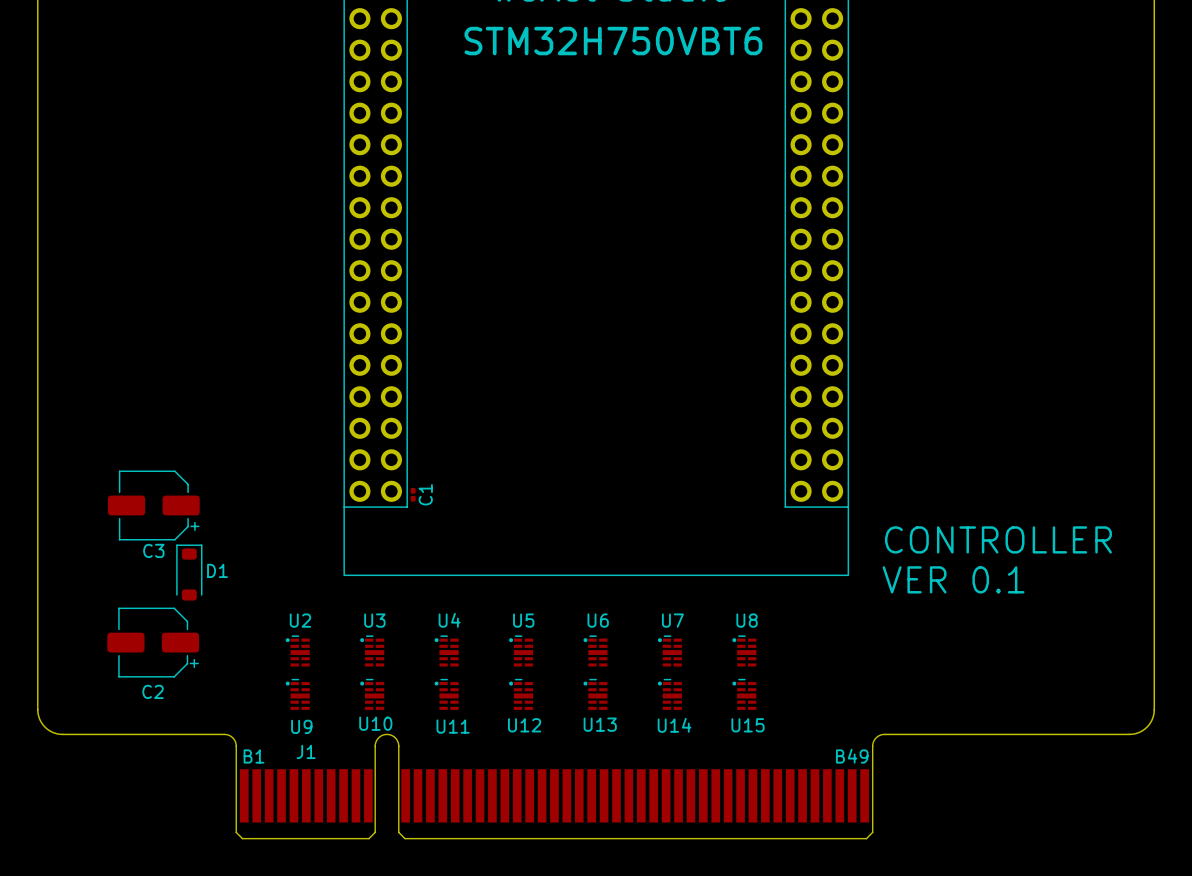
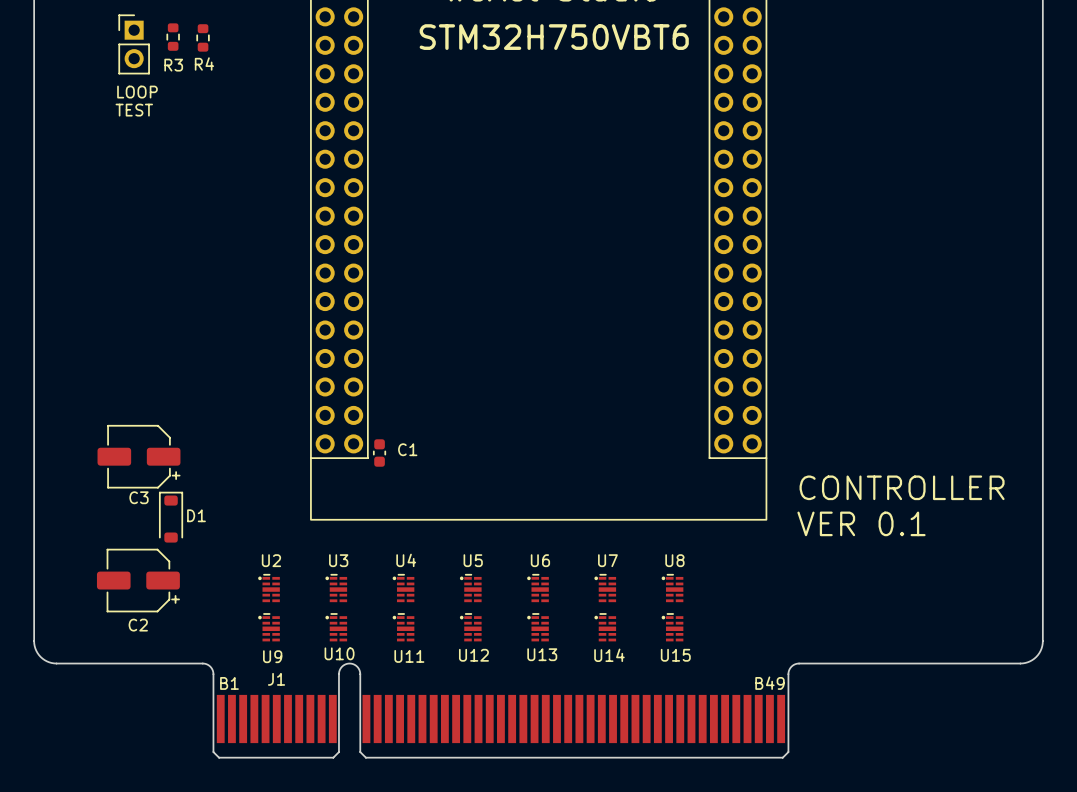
R3: none -> (173, 37)
R4: none -> (203, 37)
part: none -> (134, 44)
text: none -> LOOP (137, 92)
text: none -> TEST (134, 110)
C1 footprint: [410, 487, 416, 502] -> [373, 439, 386, 467]

